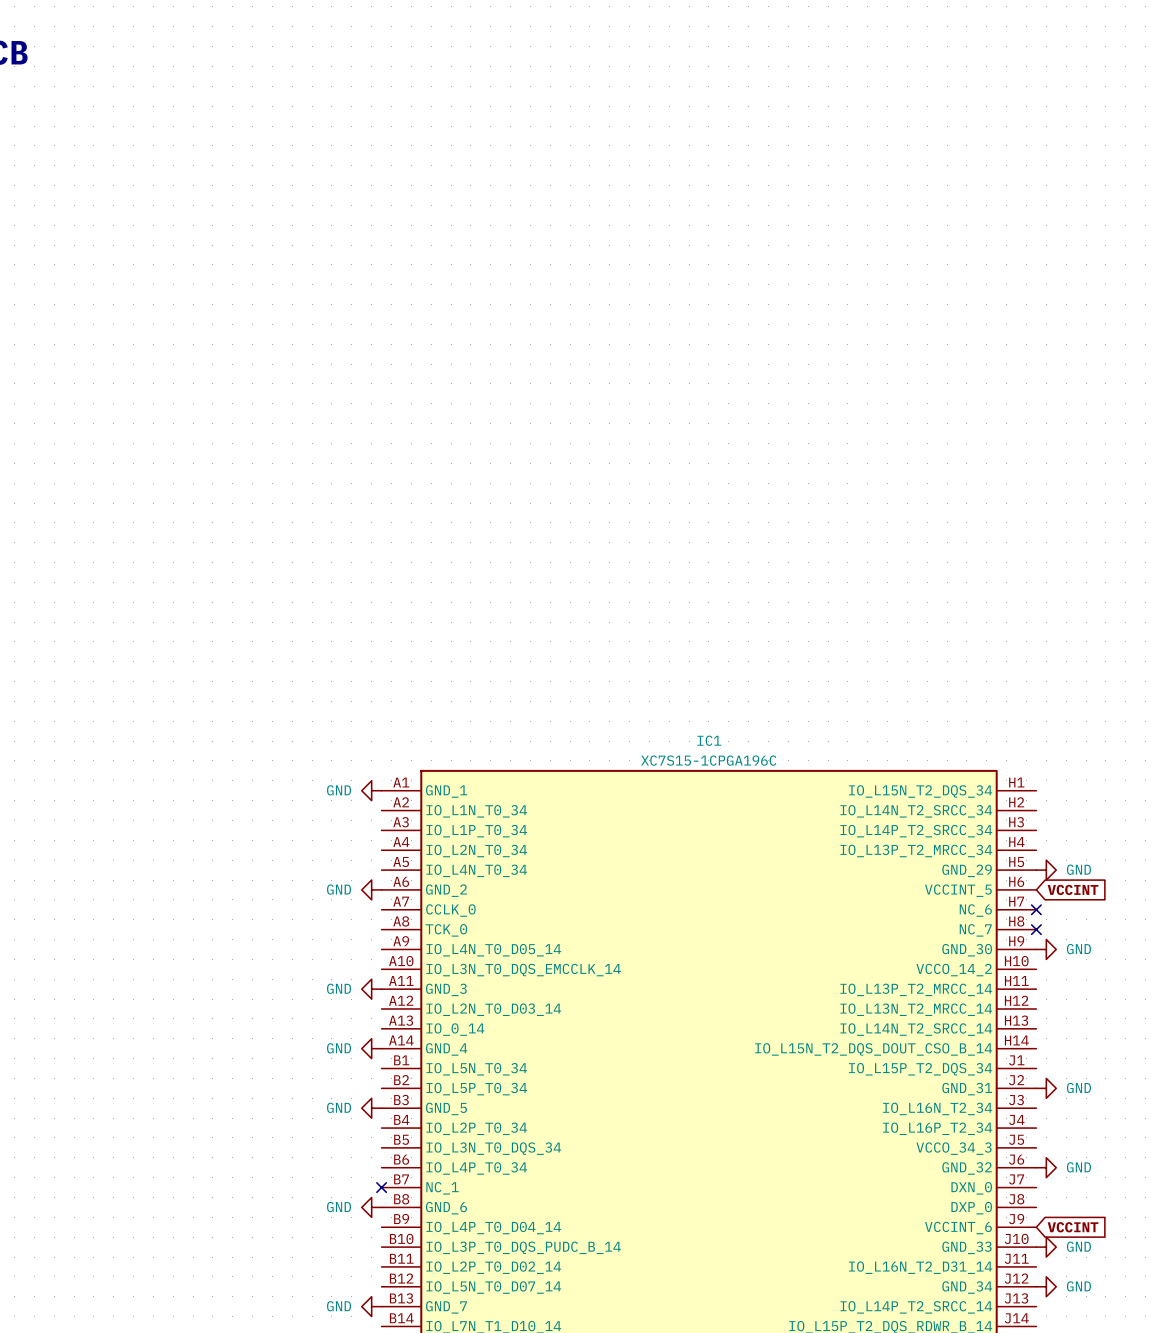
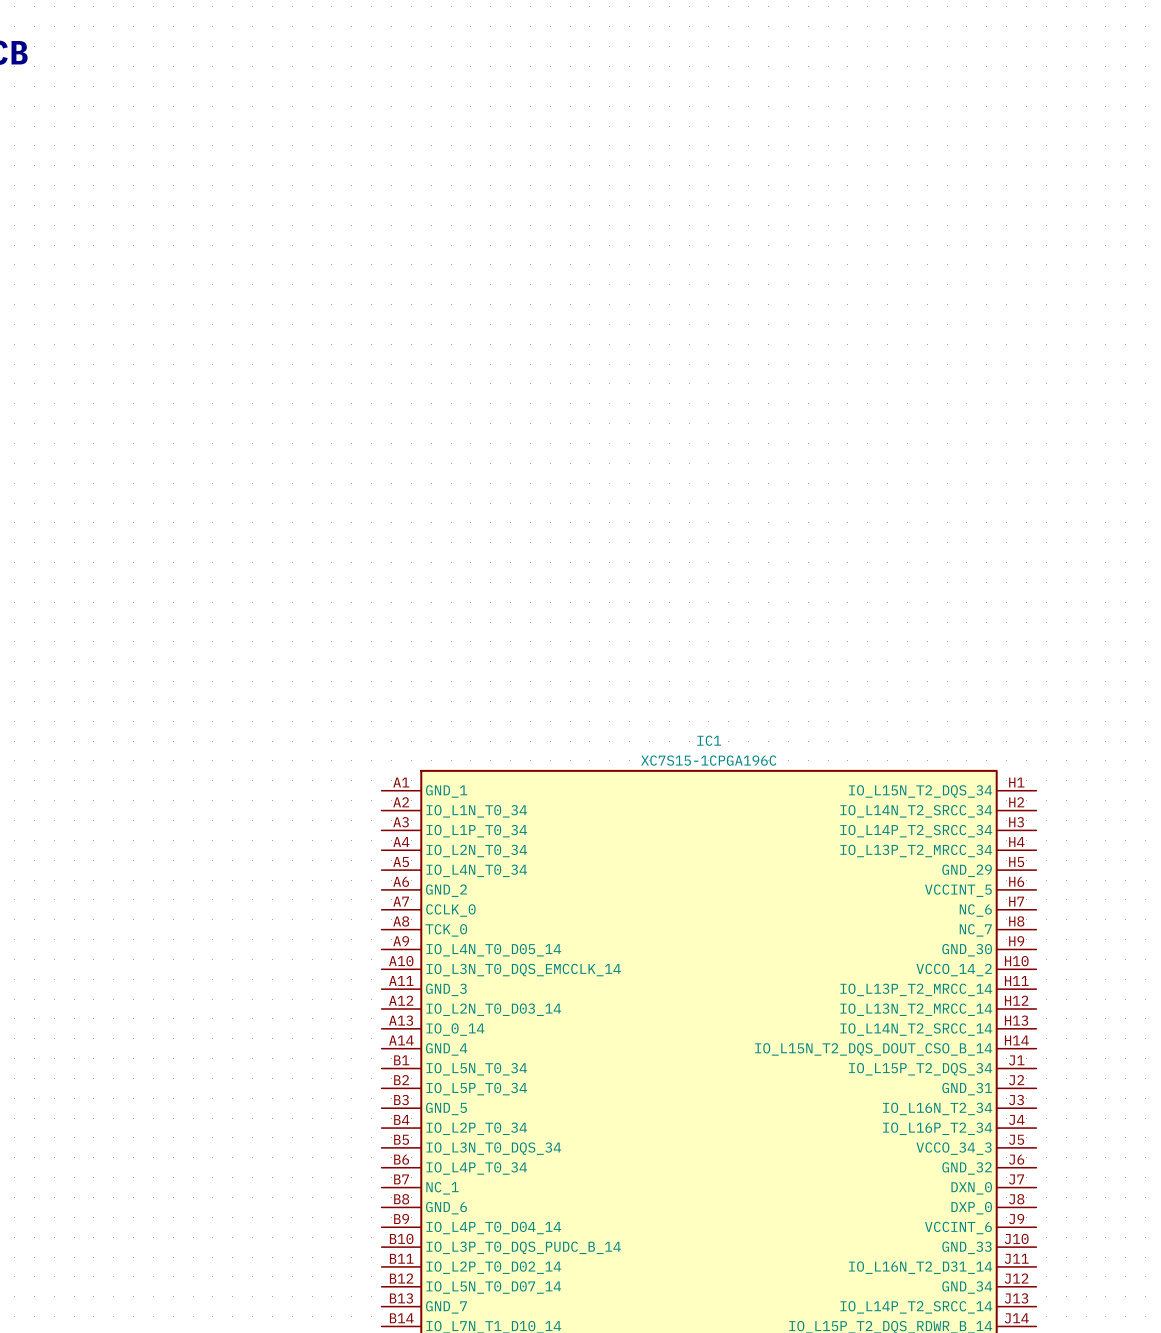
power symbol: GND (371, 790) -> none
power symbol: GND (1046, 870) -> none
power symbol: GND (371, 889) -> none
global label: VCCINT (1073, 889) -> none
no-connect mark: (1036, 909) -> none
no-connect mark: (1036, 929) -> none
power symbol: GND (1046, 949) -> none
power symbol: GND (371, 989) -> none
power symbol: GND (371, 1048) -> none
power symbol: GND (1046, 1088) -> none
power symbol: GND (371, 1108) -> none
power symbol: GND (1046, 1167) -> none
no-connect mark: (381, 1187) -> none
power symbol: GND (371, 1207) -> none
global label: VCCINT (1073, 1227) -> none
power symbol: GND (1046, 1247) -> none
power symbol: GND (1046, 1286) -> none
power symbol: GND (371, 1306) -> none

